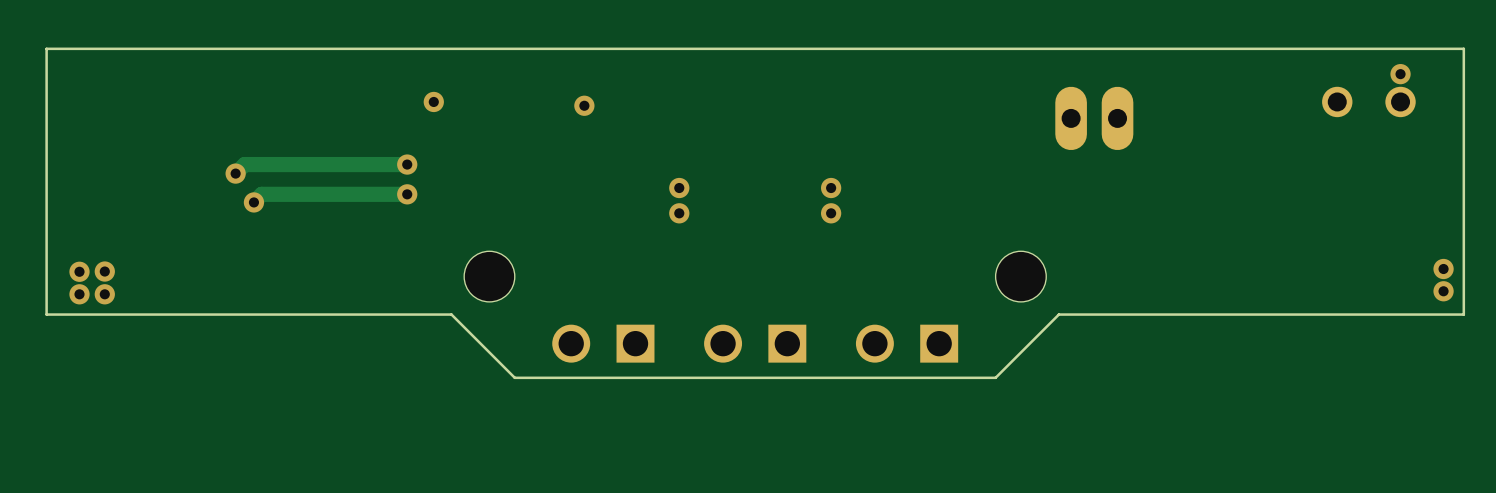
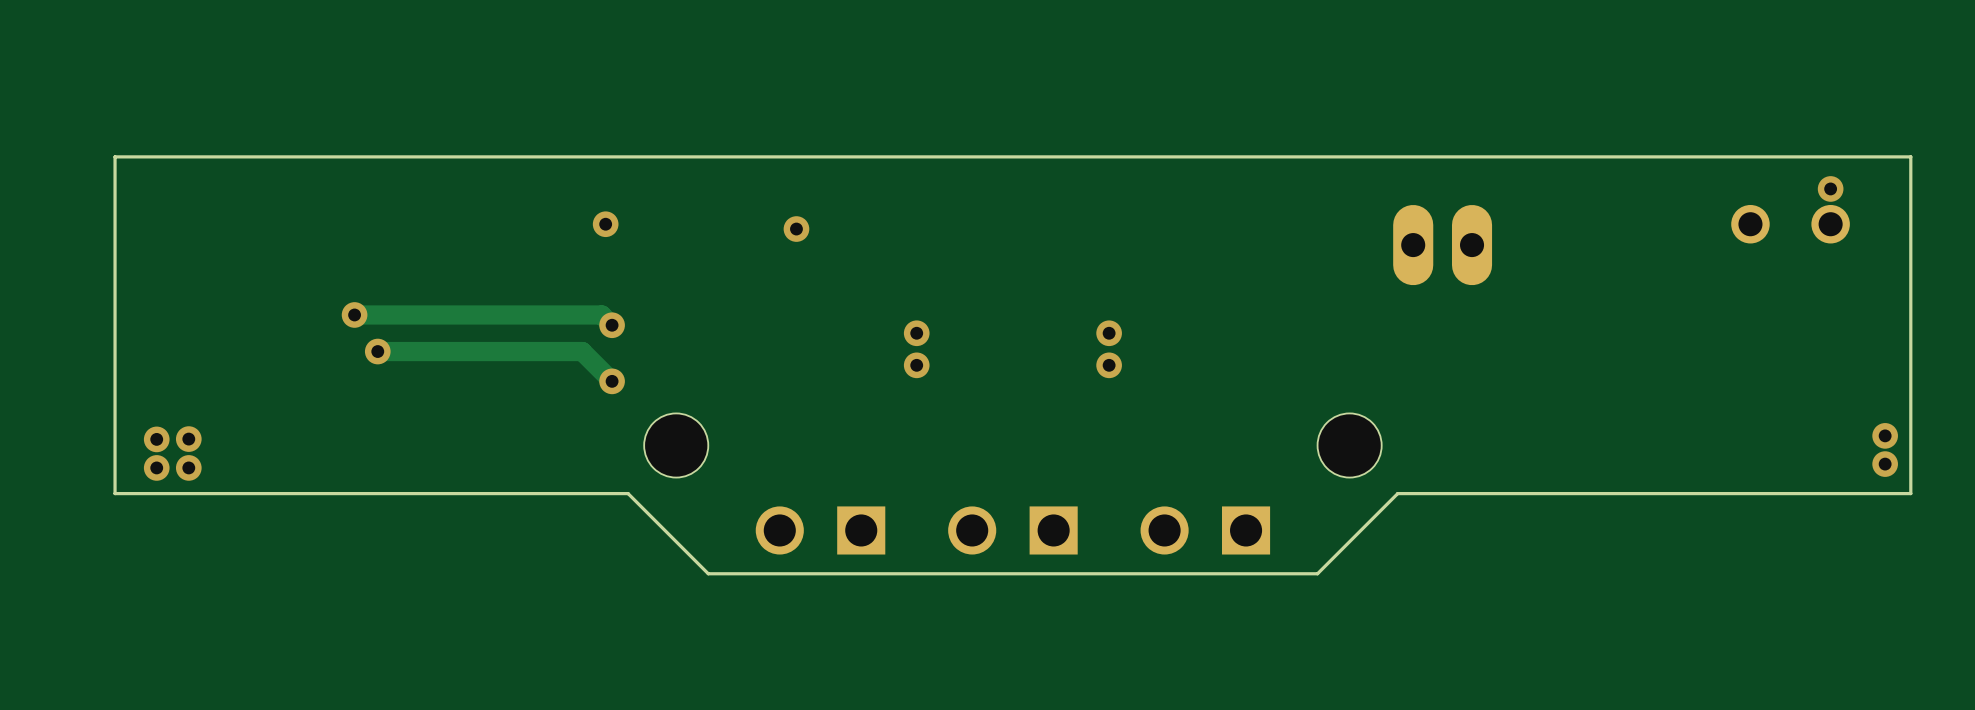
track: (407, 164) (244, 164) (235, 173) -> (612, 325) (601, 314) (354, 314)
via: (407, 164) -> none
via: none -> (612, 325)
track: (407, 194) (261, 194) (253, 202) -> (612, 381) (582, 351) (377, 351)
via: (407, 194) -> none
via: none -> (612, 381)

